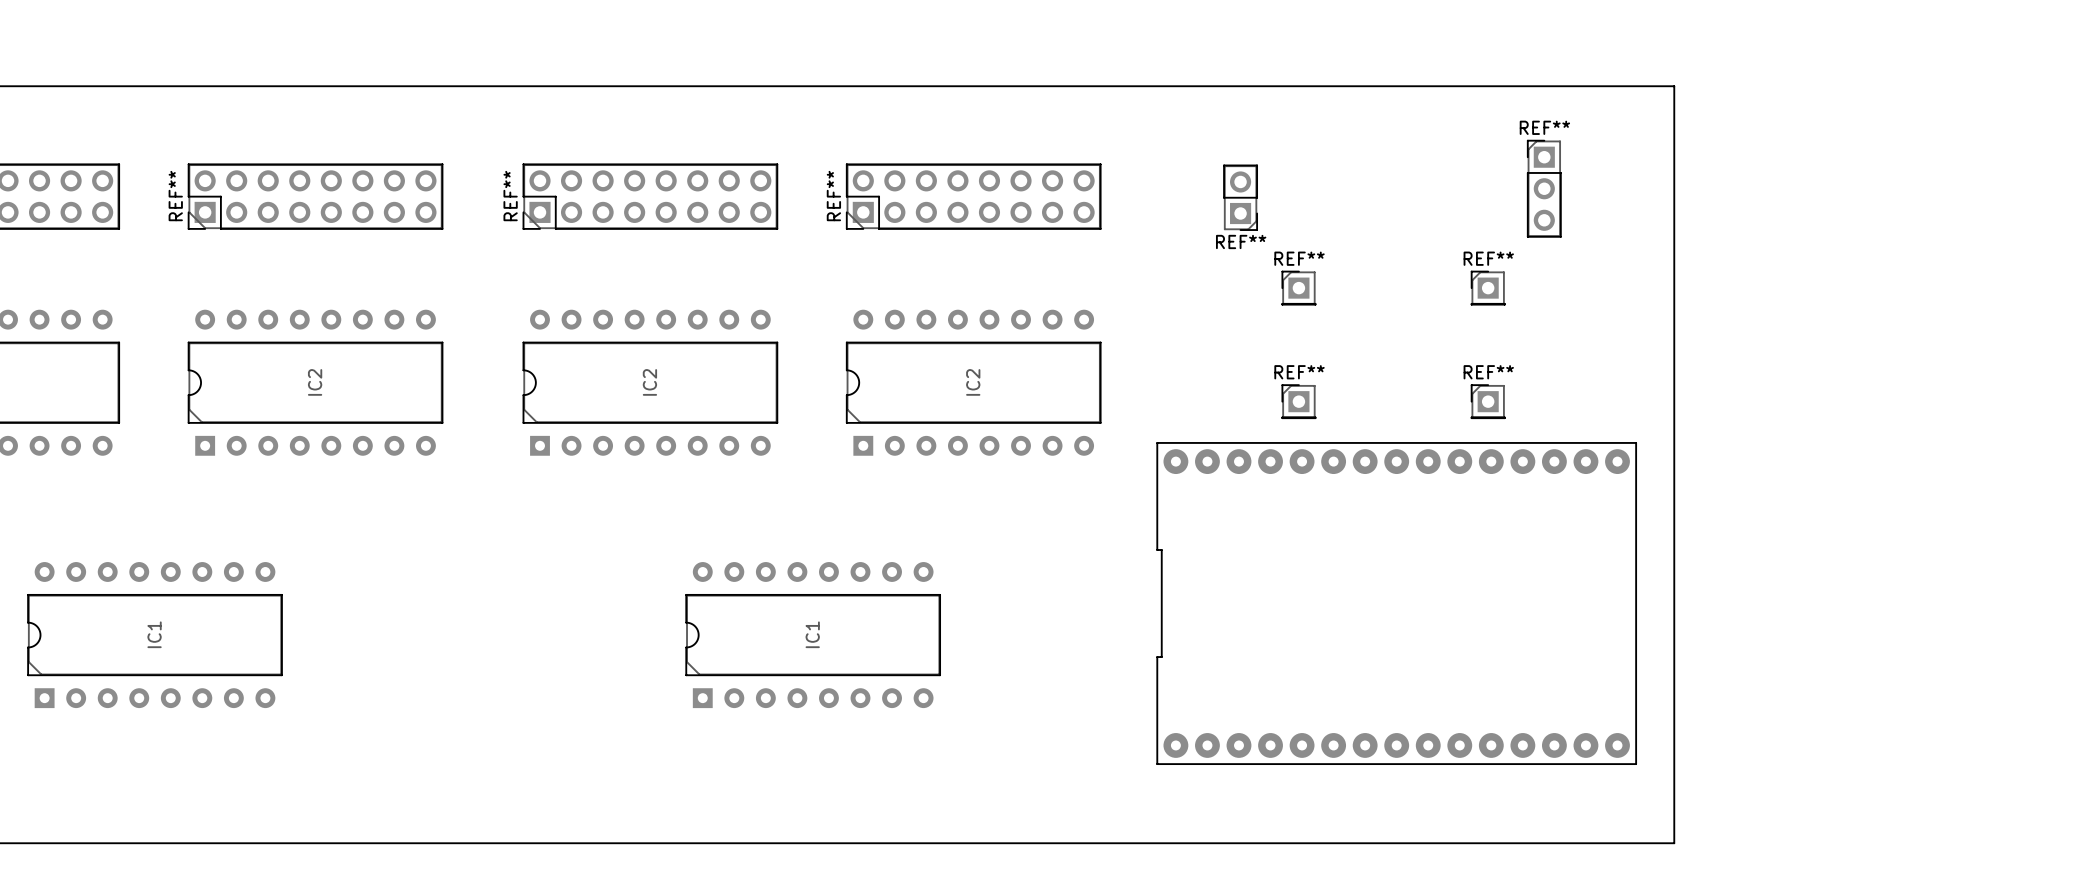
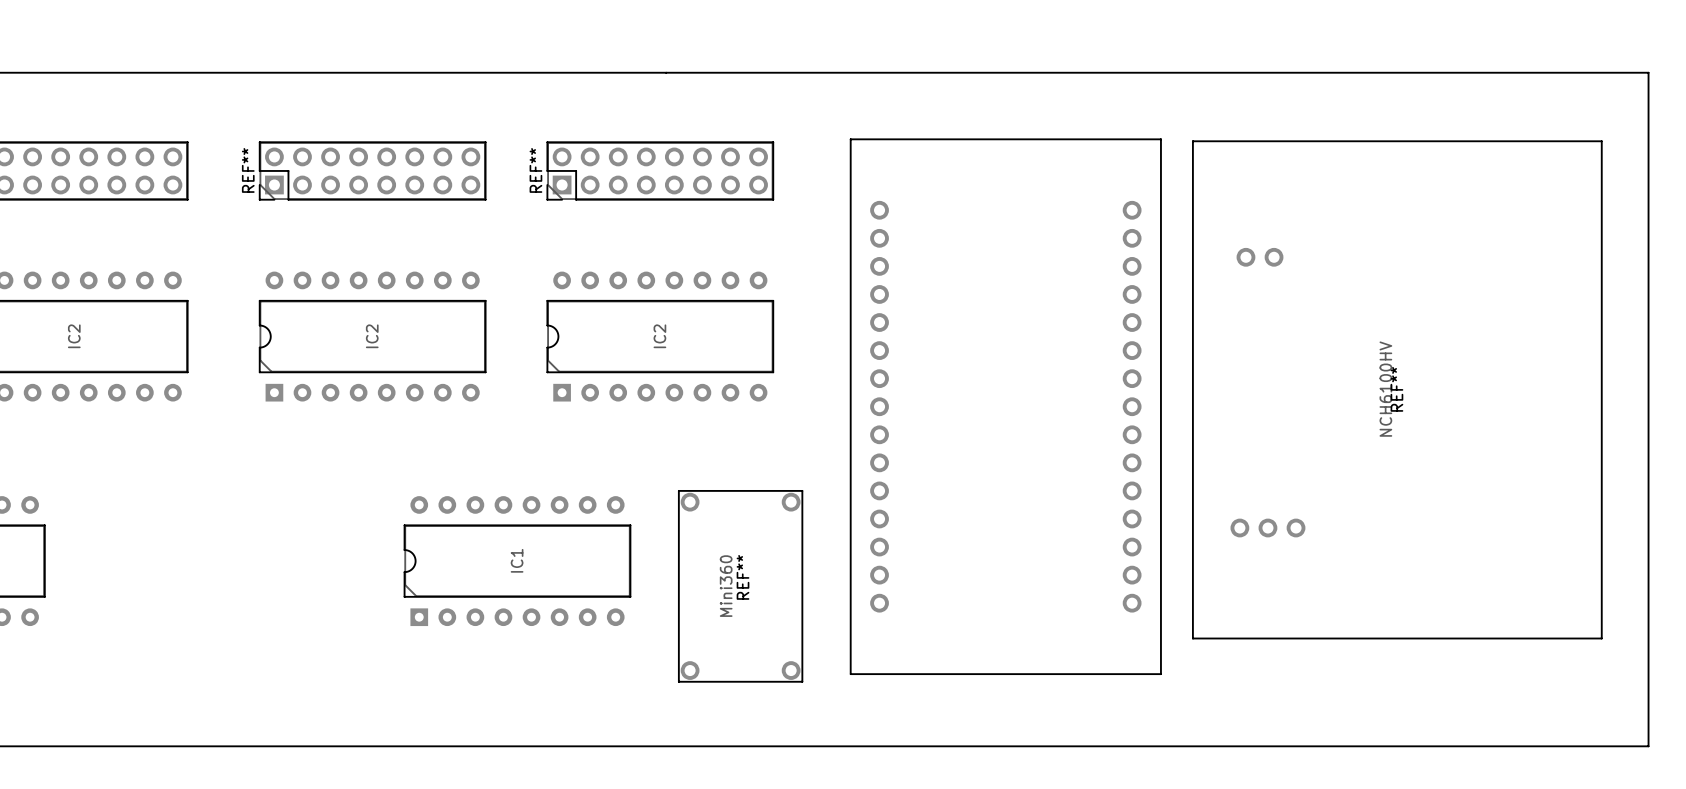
board edge: (1674, 86) (1674, 843) -> (1283, 72) (1648, 72) (1648, 746) (1283, 746)
REF**: (1544, 188) -> none
REF**: (1240, 197) -> none
REF**: (1298, 288) -> none
REF**: (1488, 288) -> none
REF**: (1298, 401) -> none
REF**: (1488, 401) -> none
REF**: none -> NCH6100HV (1397, 389)
part: none -> (1005, 406)
part: (1396, 603) -> none
REF**: none -> Mini360 (740, 586)

